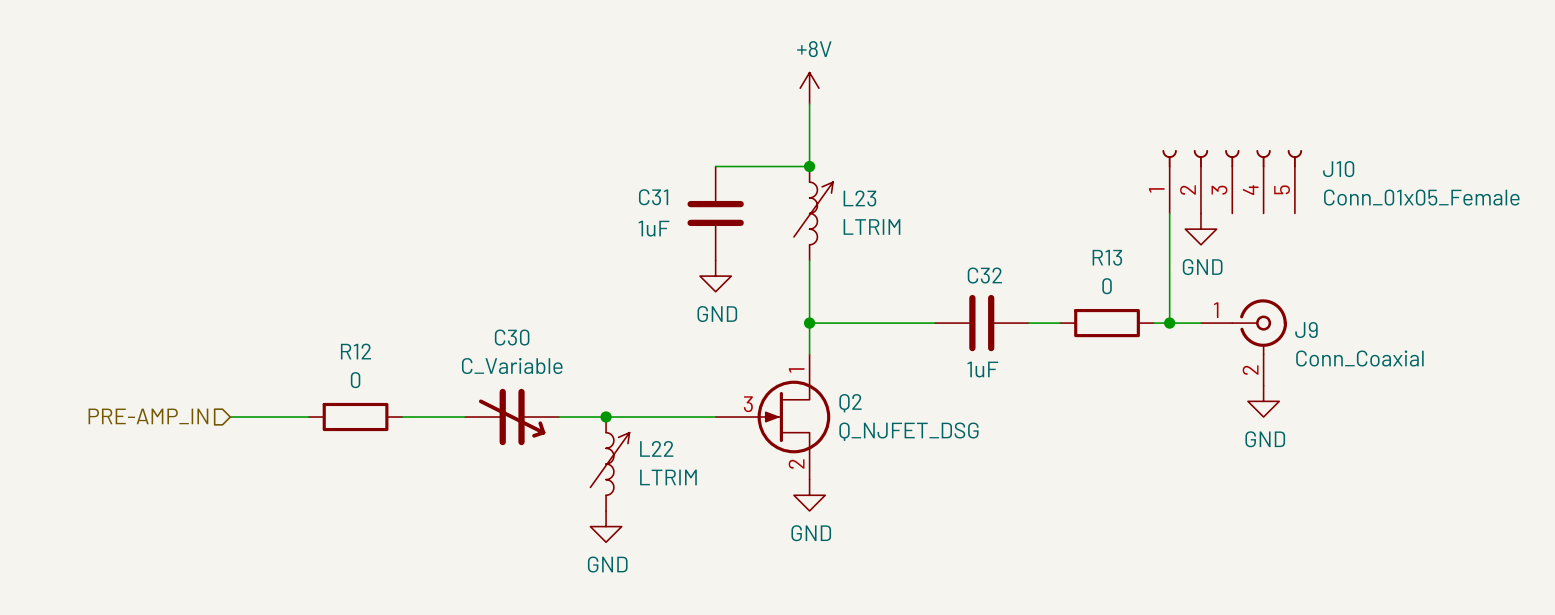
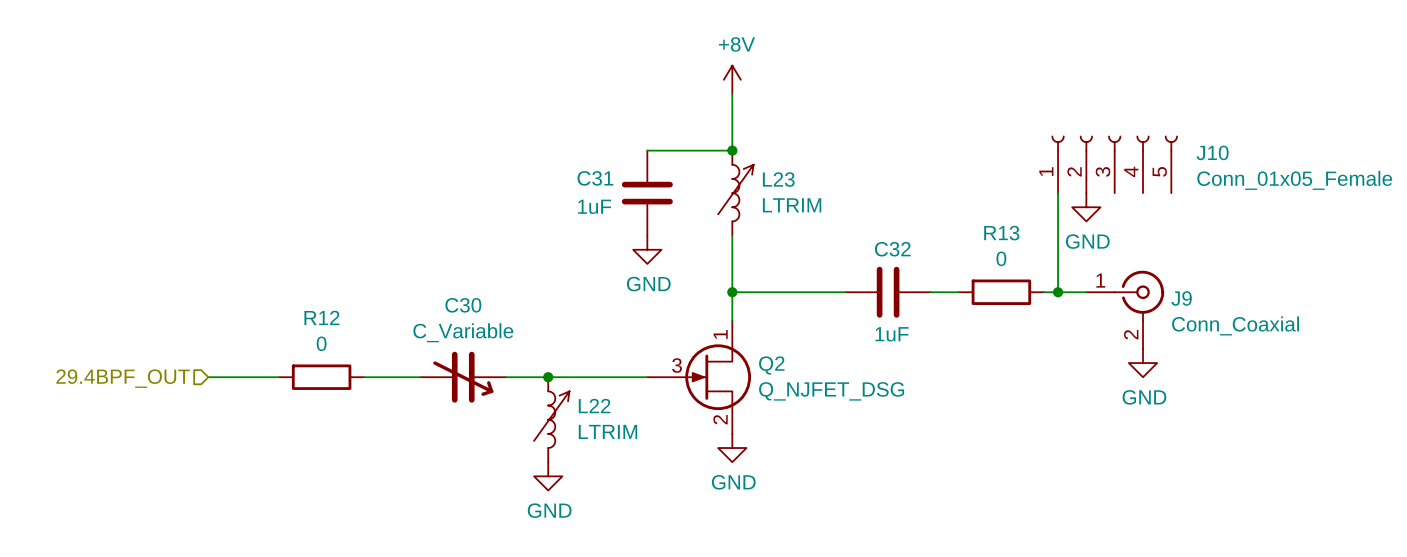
hierarchical label: PRE-AMP_IN (148, 416) -> 29.4BPF_OUT (123, 378)

